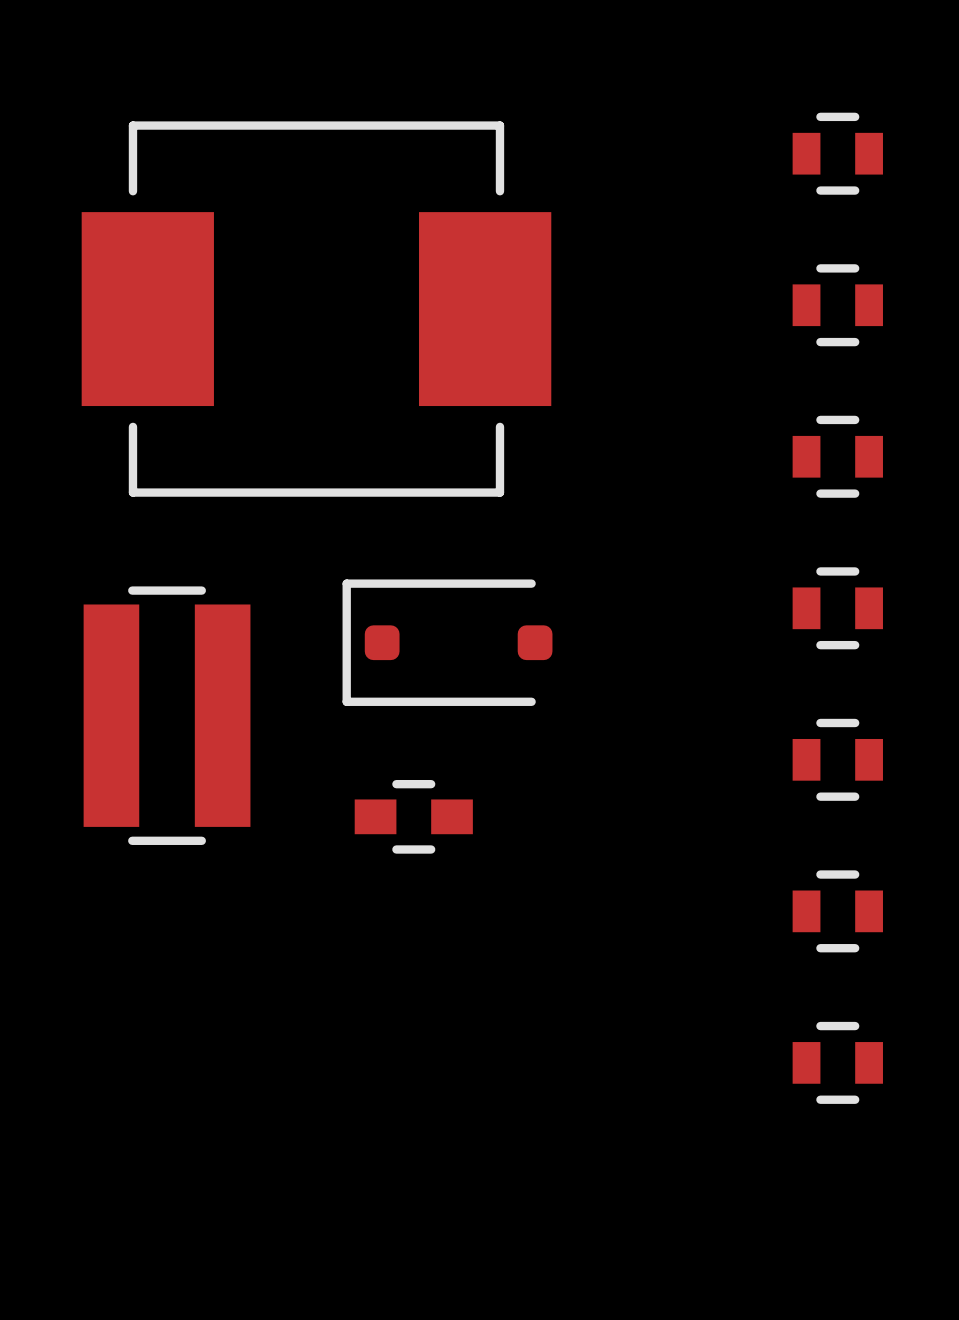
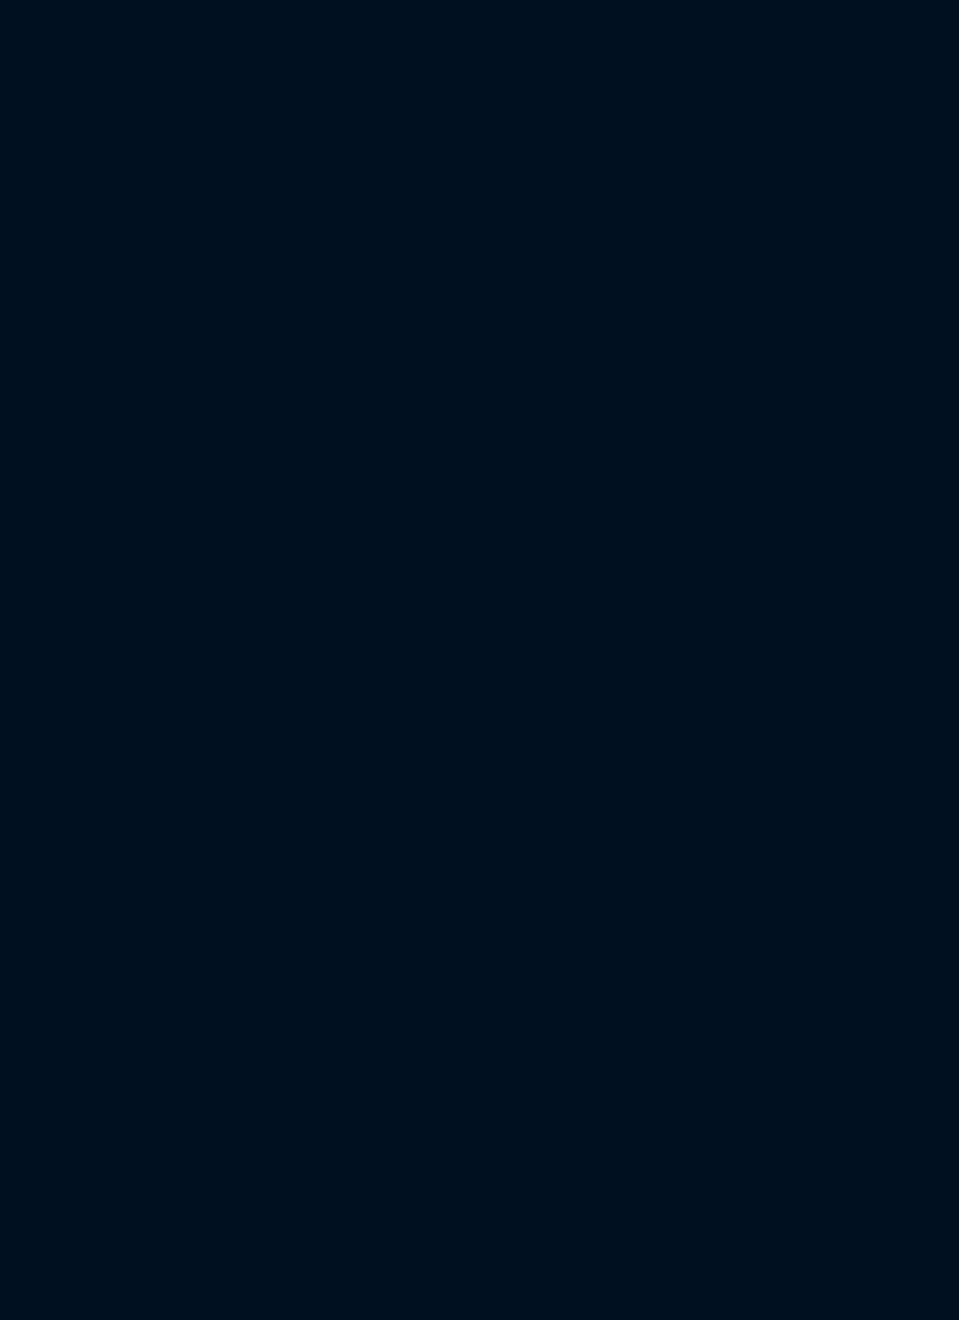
part: (837, 153) -> none
part: (837, 305) -> none
part: (316, 309) -> none
part: (837, 456) -> none
part: (837, 608) -> none
part: (447, 642) -> none
part: (167, 715) -> none
part: (837, 759) -> none
part: (413, 816) -> none
part: (837, 911) -> none
part: (837, 1062) -> none

